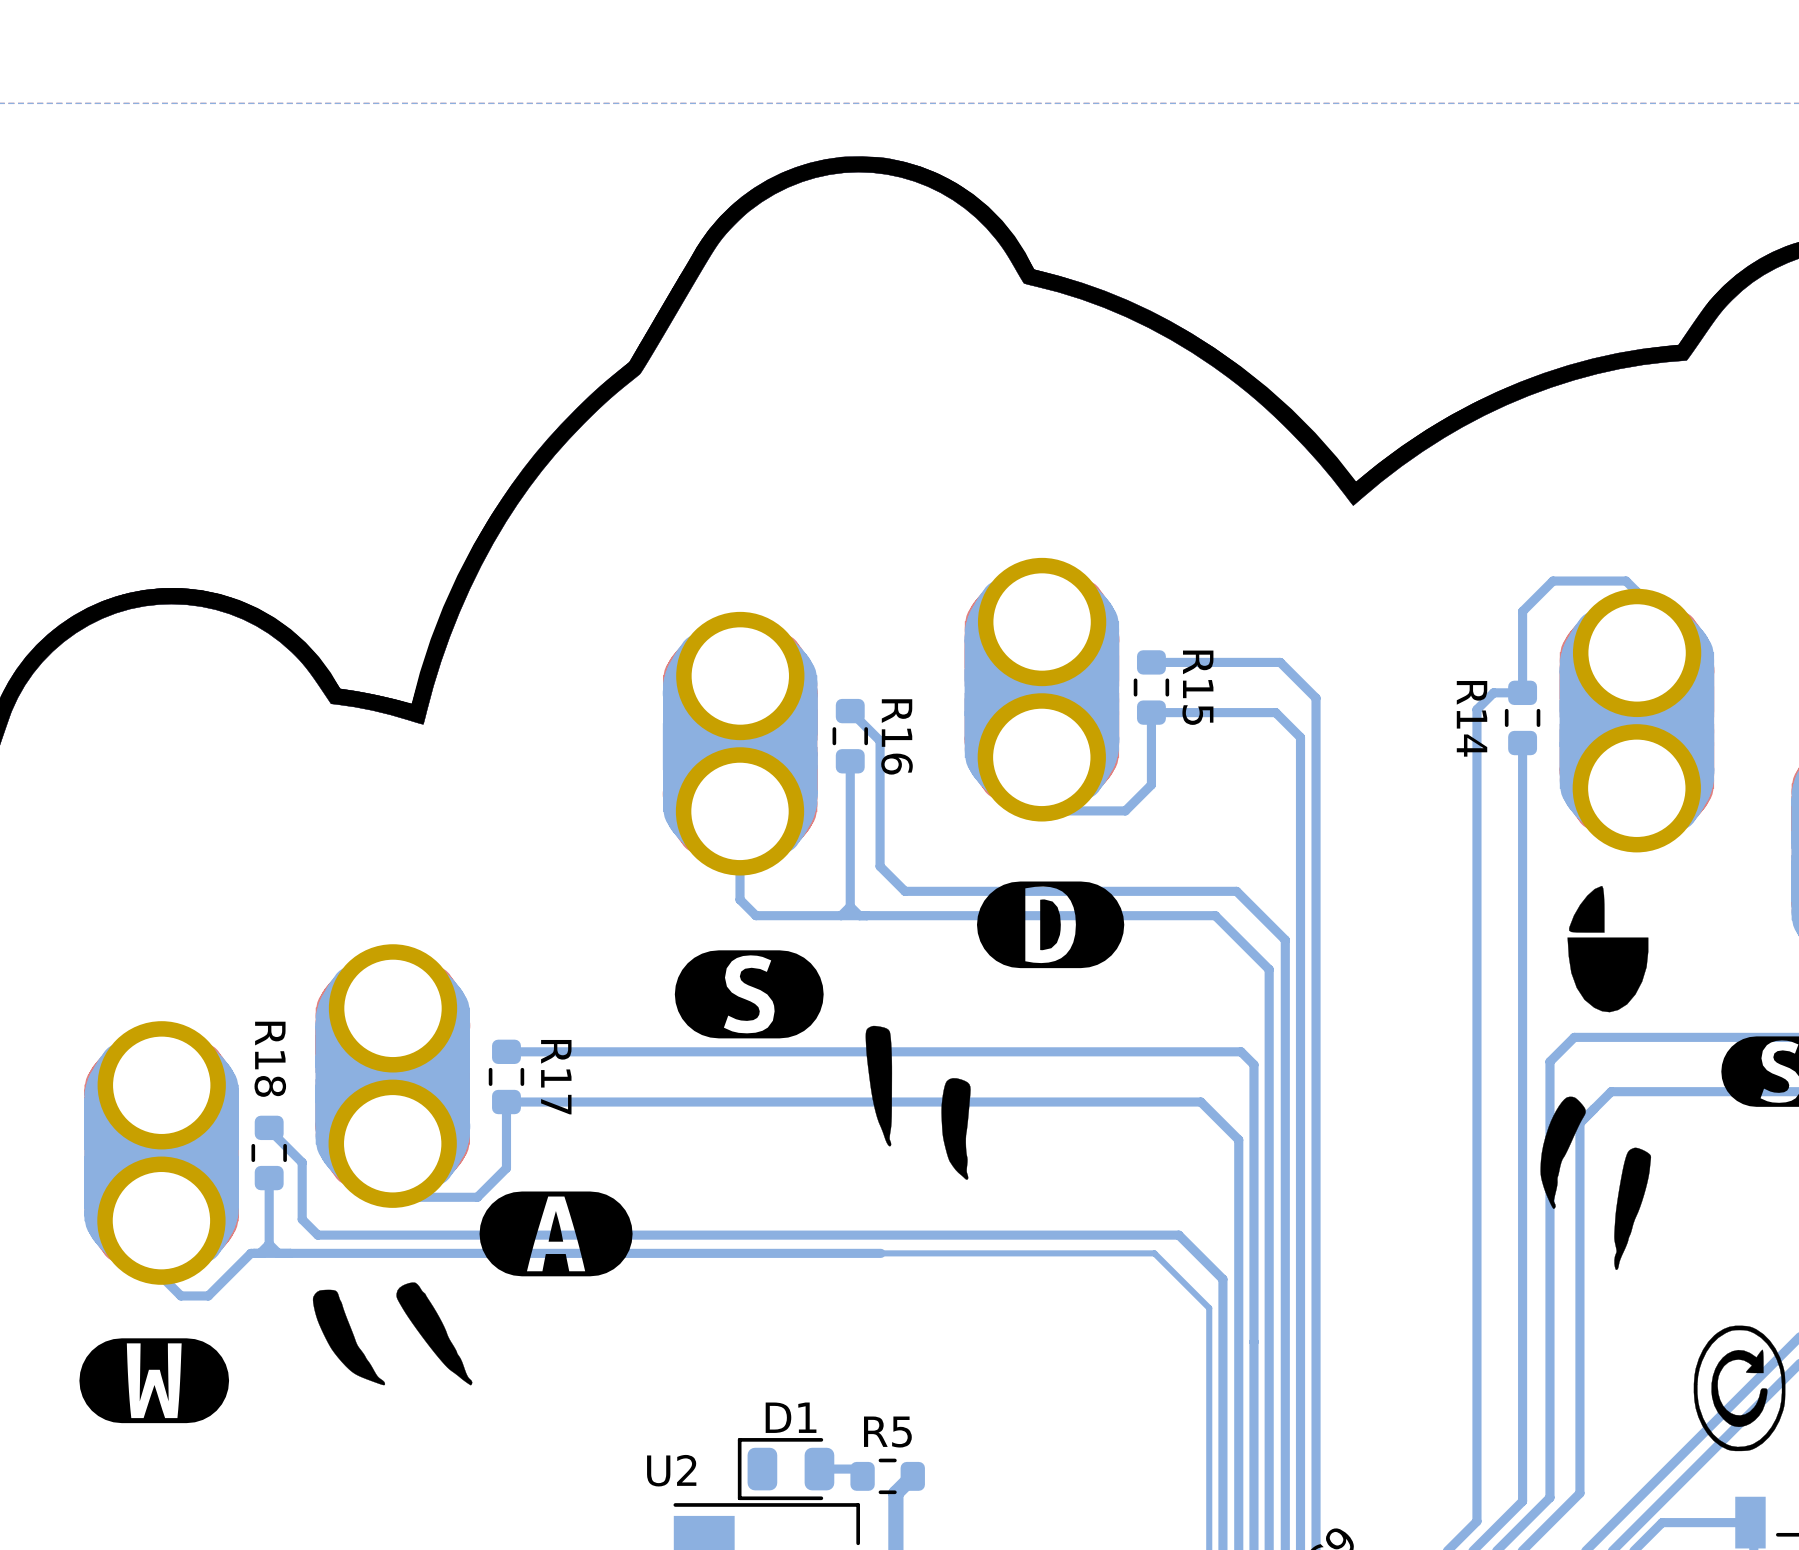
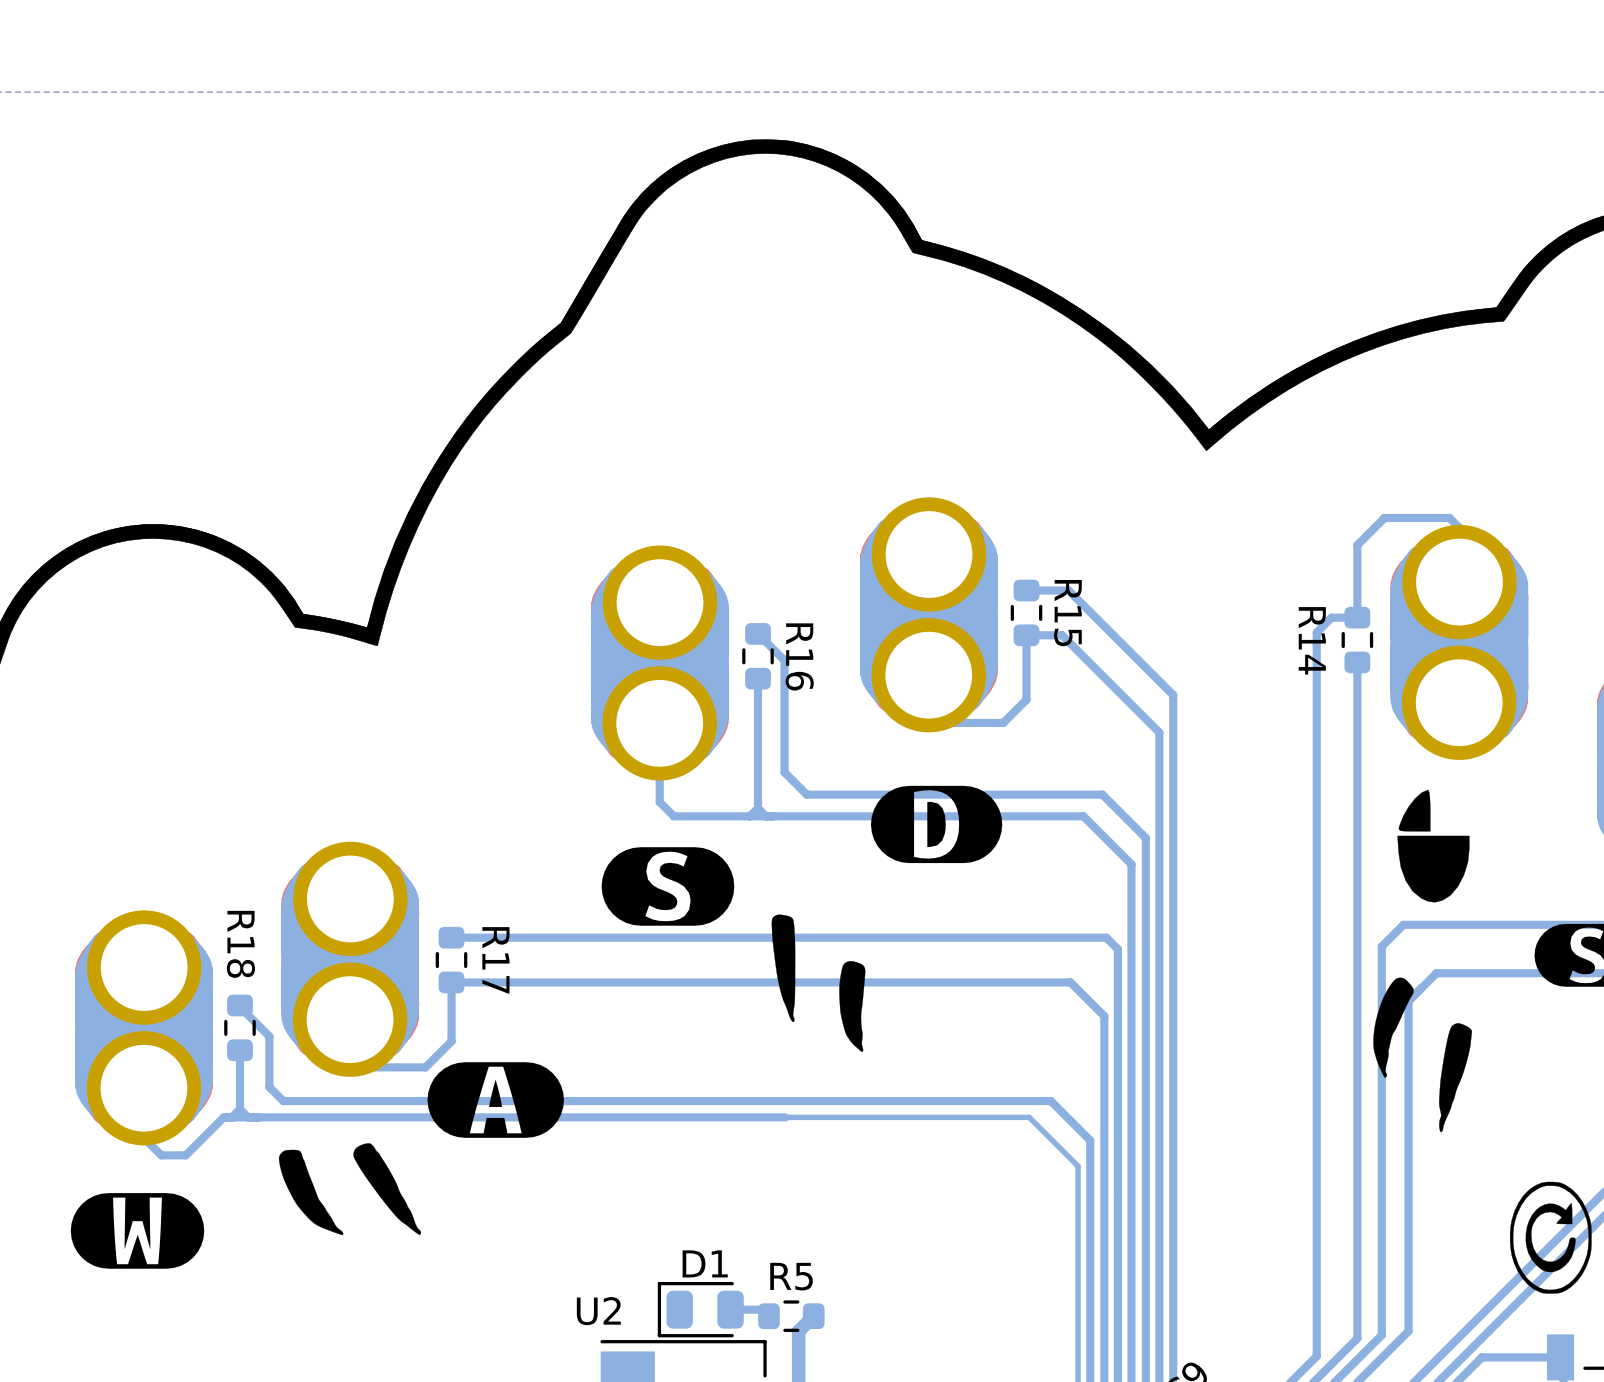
bottom track: (1198, 662) (1280, 662) (1316, 698) (1316, 779) -> (1068, 590) (1173, 695)
bottom track: (1191, 712) (1275, 712) (1300, 737) (1300, 821) -> (1062, 635) (1159, 732)

